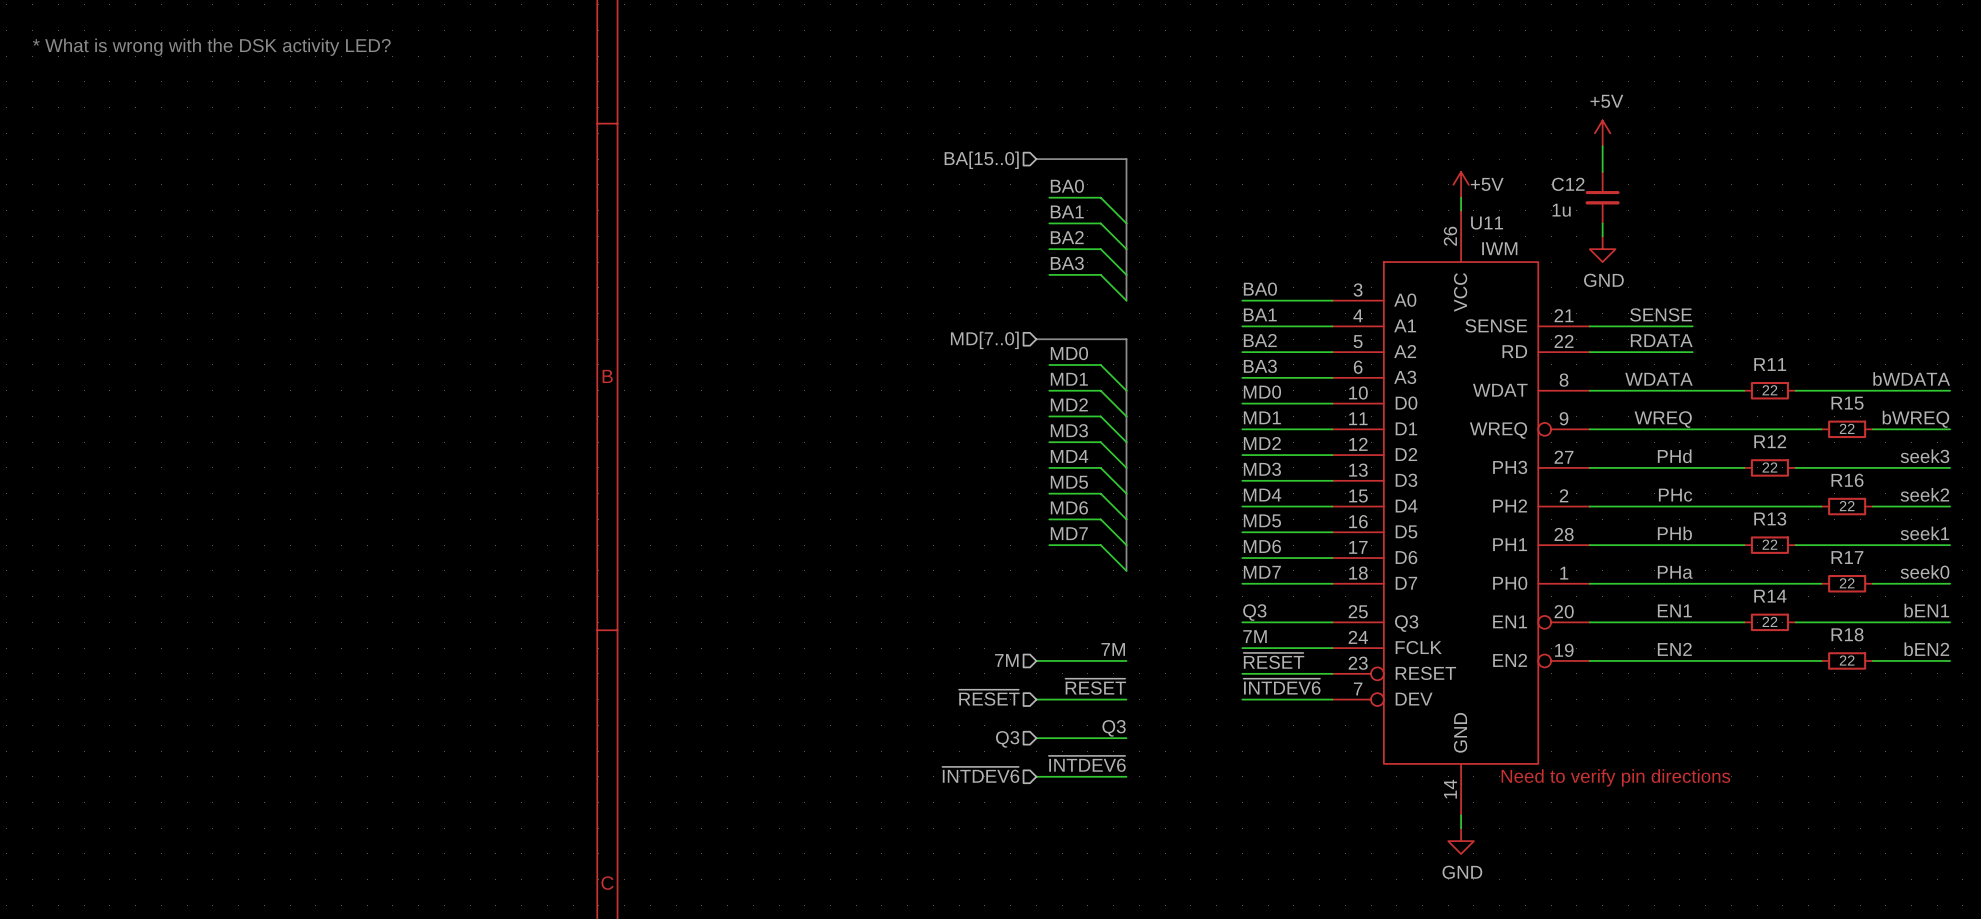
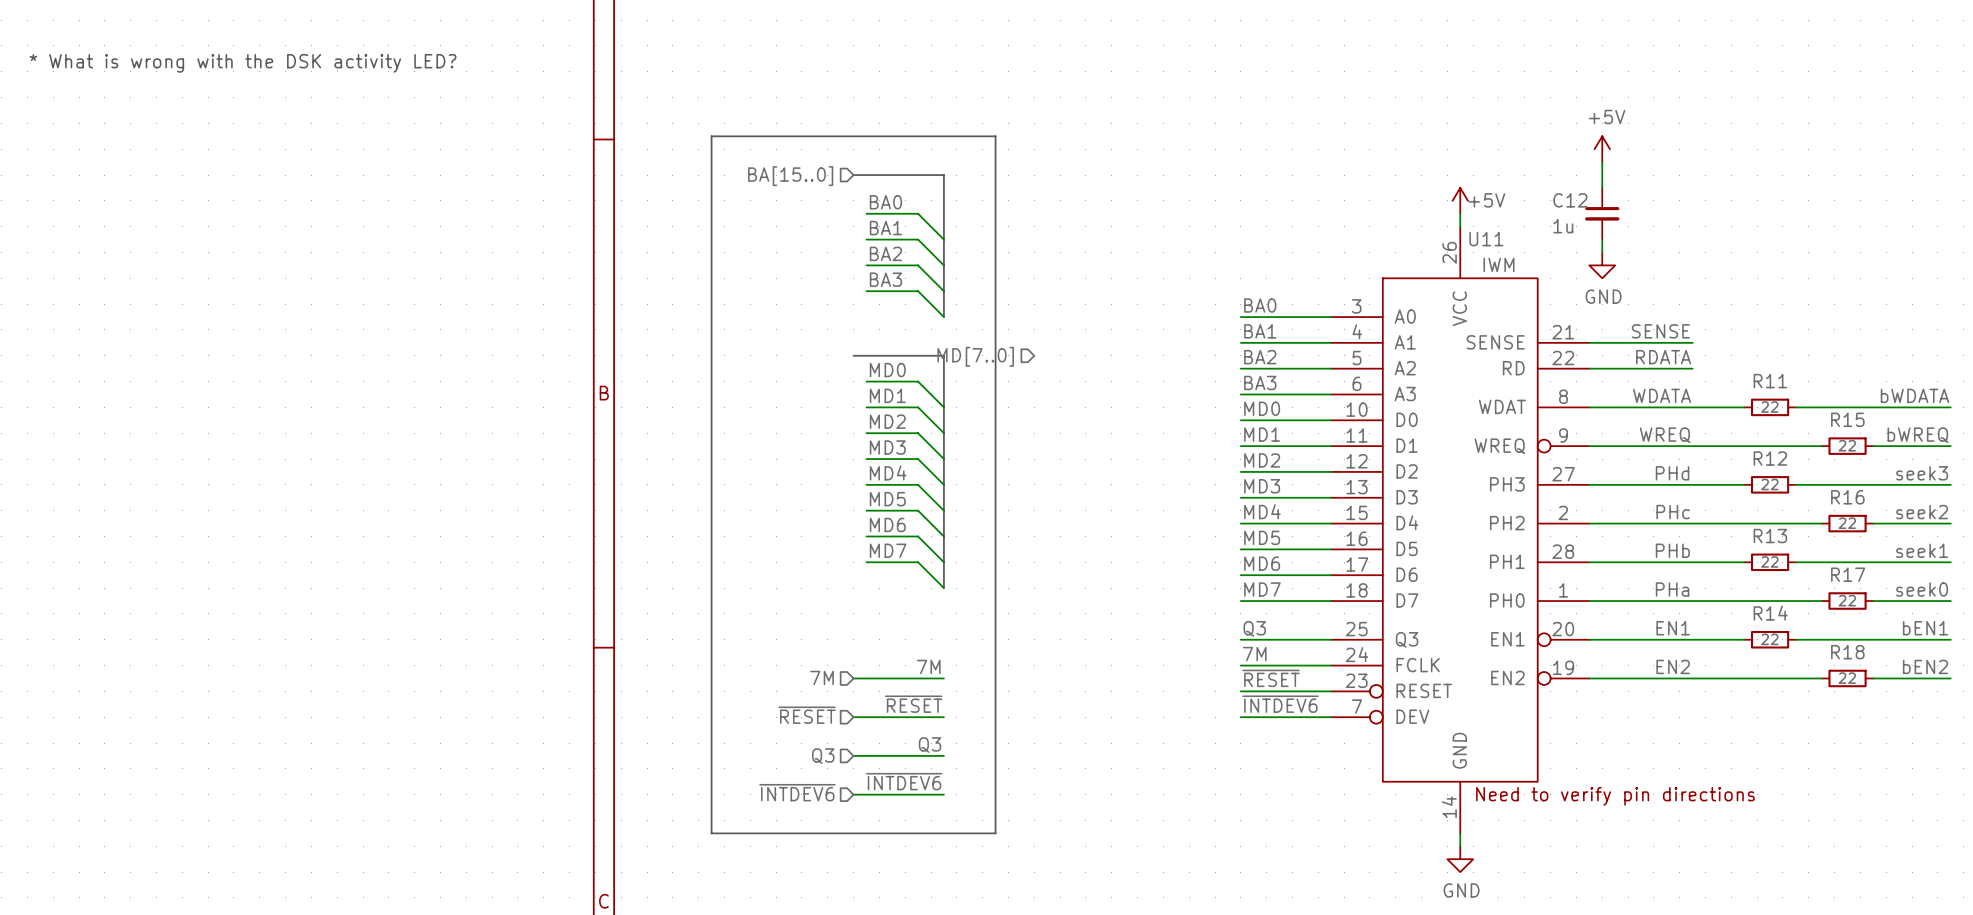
line: none -> (711, 136) (995, 136) (995, 833) (711, 833) (711, 136)
bus: (1036, 159) (1126, 159) (1126, 300) -> (853, 175) (943, 175) (943, 317)
hierarchical label position: BA[15..0] (981, 160) -> BA[15..0] (790, 176)
label position: BA0 (1067, 186) -> BA0 (885, 202)
wire: (1049, 197) (1100, 197) (1126, 223) -> (866, 213) (918, 213) (943, 239)
label position: BA1 (1067, 211) -> BA1 (885, 228)
wire: (1049, 223) (1100, 223) (1126, 249) -> (866, 239) (918, 239) (943, 265)
label position: BA2 (1067, 237) -> BA2 (885, 253)
wire: (1049, 249) (1100, 249) (1126, 274) -> (866, 265) (918, 265) (943, 291)
label position: BA3 (1067, 263) -> BA3 (885, 279)
wire: (1049, 274) (1100, 274) (1126, 300) -> (866, 291) (918, 291) (943, 317)
bus: (1036, 339) (1126, 339) (1126, 570) -> (853, 355) (943, 355) (943, 588)
label position: MD0 (1069, 353) -> MD0 (887, 370)
wire: (1049, 364) (1100, 364) (1126, 390) -> (866, 381) (918, 381) (943, 407)
label position: MD1 (1069, 379) -> MD1 (887, 395)
wire: (1049, 390) (1100, 390) (1126, 416) -> (866, 407) (918, 407) (943, 433)
label position: MD2 (1069, 404) -> MD2 (887, 421)
wire: (1049, 416) (1100, 416) (1126, 442) -> (866, 433) (918, 433) (943, 459)
label position: MD3 (1069, 430) -> MD3 (887, 447)
wire: (1049, 442) (1100, 442) (1126, 467) -> (866, 459) (918, 459) (943, 484)
label position: MD4 (1069, 456) -> MD4 (888, 473)
wire: (1049, 467) (1100, 467) (1126, 493) -> (866, 484) (918, 484) (943, 510)
label position: MD5 (1069, 482) -> MD5 (887, 499)
wire: (1049, 493) (1100, 493) (1126, 519) -> (866, 510) (918, 510) (943, 536)
label position: MD6 (1069, 507) -> MD6 (887, 524)
wire: (1049, 519) (1100, 519) (1126, 545) -> (866, 536) (918, 536) (943, 562)
label position: MD7 (1069, 533) -> MD7 (888, 550)
wire: (1049, 545) (1100, 545) (1126, 570) -> (866, 562) (918, 562) (943, 588)
label position: 7M (1113, 649) -> 7M (928, 666)
hierarchical label position: 7M (1006, 660) -> 7M (822, 677)
wire: (1036, 660) (1126, 660) -> (853, 678) (943, 678)
label position: ~{RESET} (1095, 686) -> ~{RESET} (913, 704)
hierarchical label position: ~{RESET} (989, 697) -> ~{RESET} (806, 715)
wire: (1036, 699) (1126, 699) -> (853, 717) (943, 717)
label position: Q3 (1114, 728) -> Q3 (930, 745)
wire: (1036, 738) (1126, 738) -> (853, 755) (943, 755)
hierarchical label position: Q3 (1007, 739) -> Q3 (823, 756)
label position: ~{INTDEV6} (1087, 763) -> ~{INTDEV6} (904, 781)
hierarchical label position: ~{INTDEV6} (980, 774) -> ~{INTDEV6} (797, 792)
wire: (1036, 776) (1126, 776) -> (853, 794) (943, 794)

